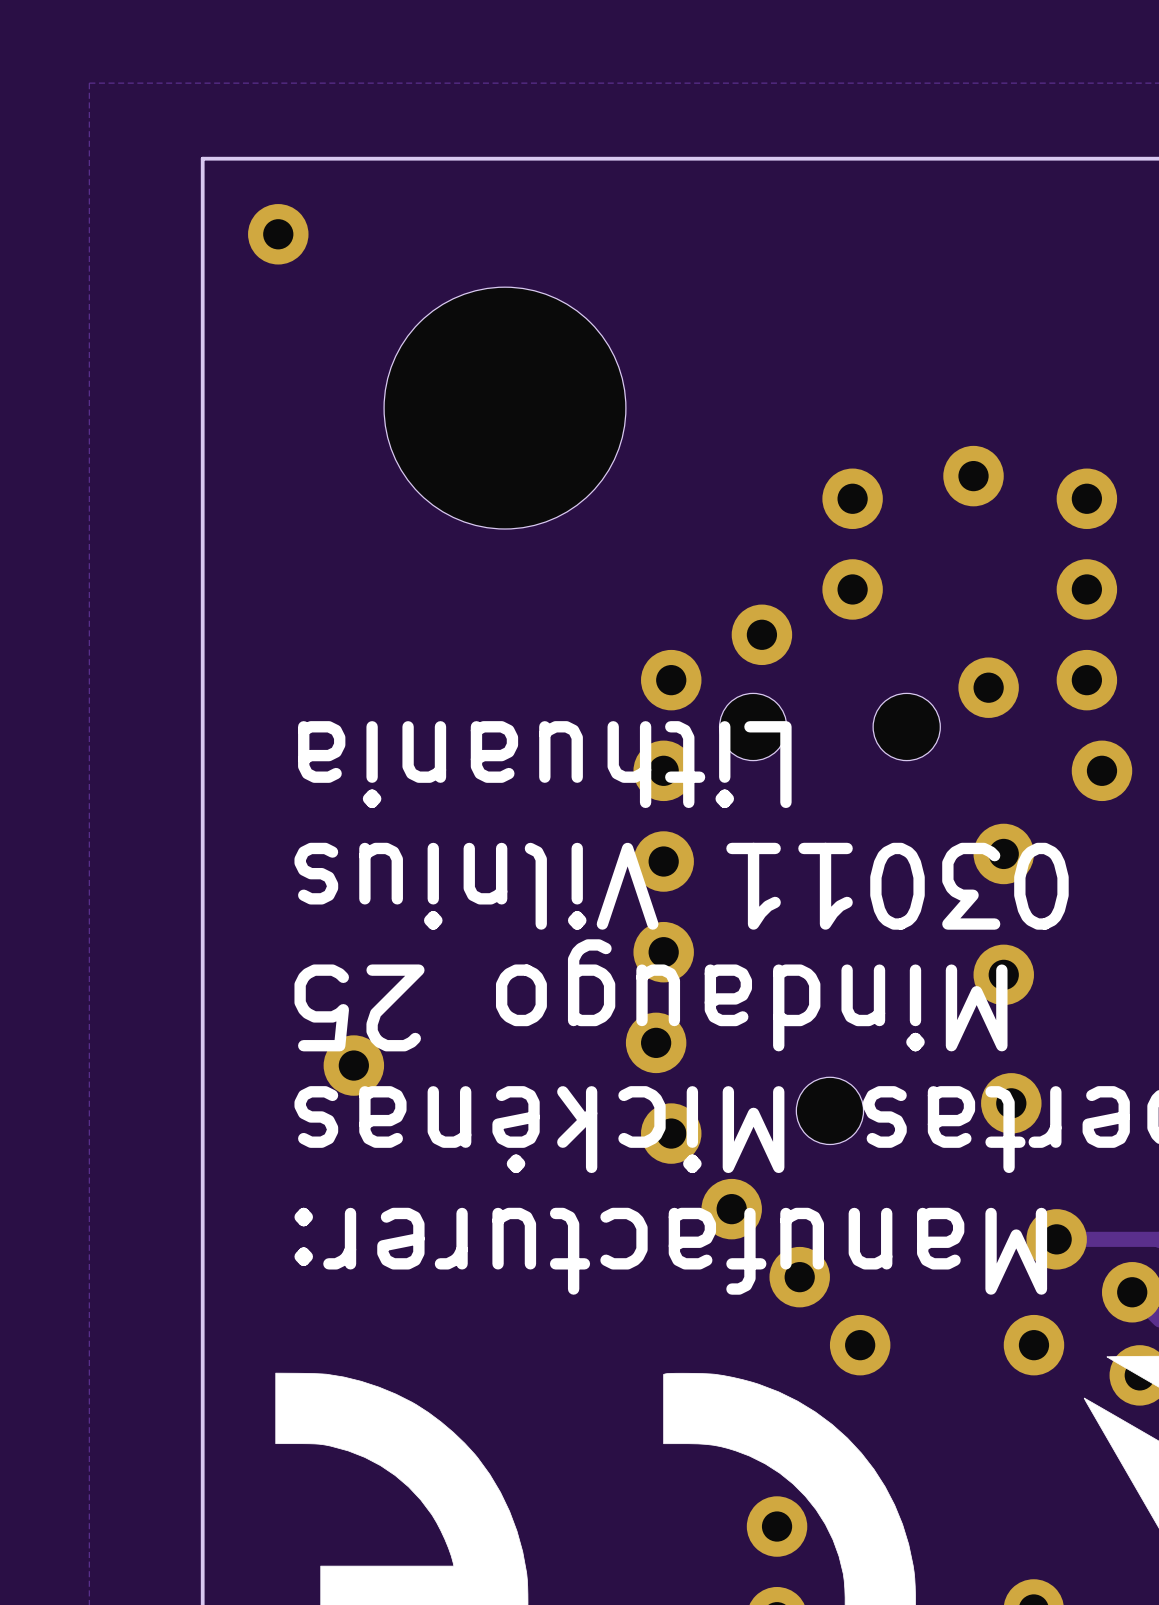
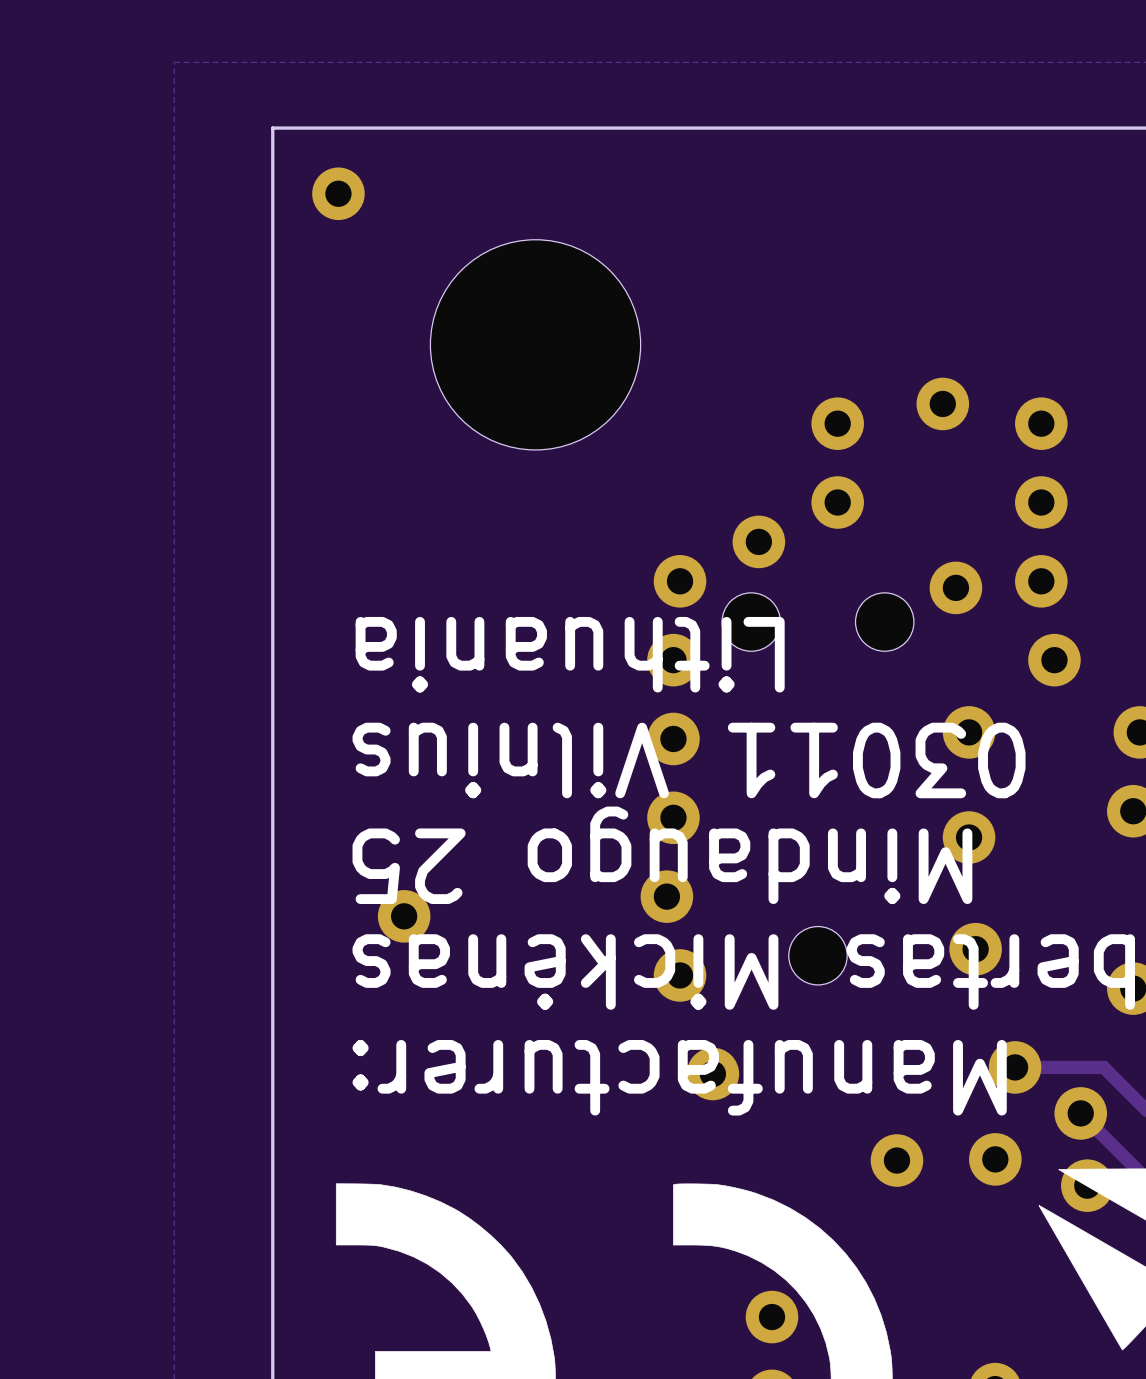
via position: (731, 1209) -> (712, 1073)
via: (799, 1277) -> none
via position: (860, 1345) -> (896, 1160)

